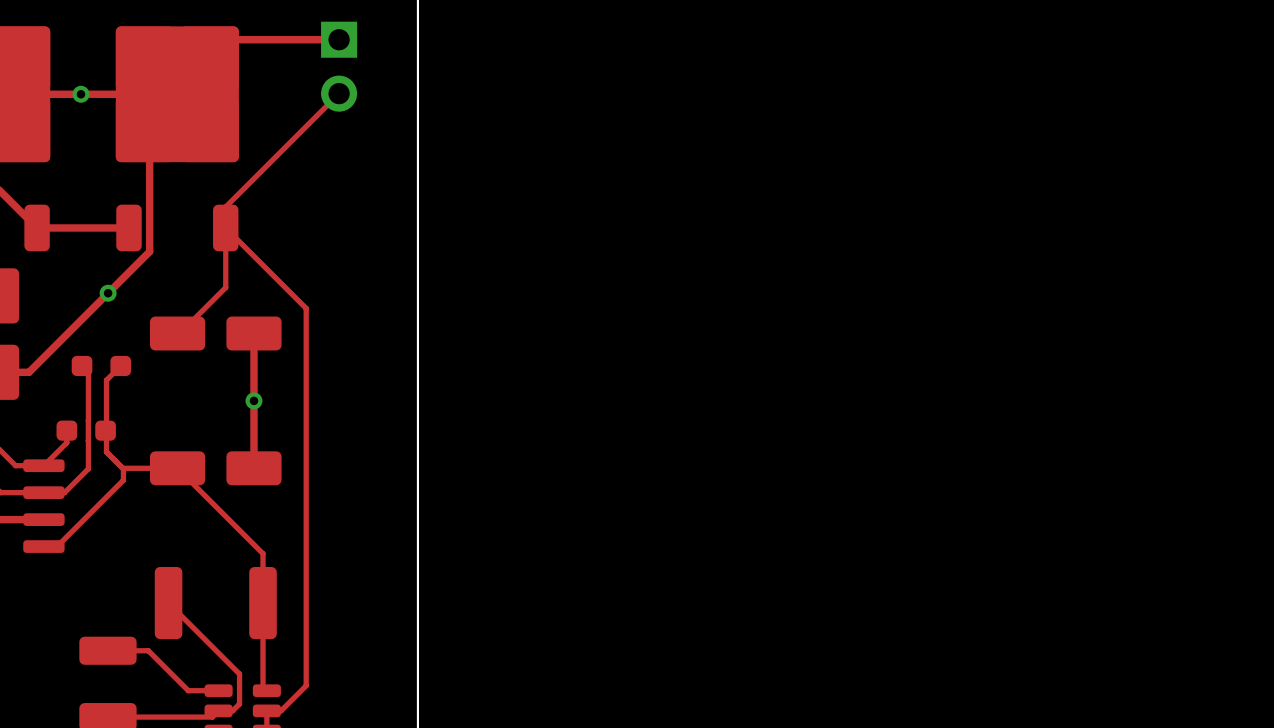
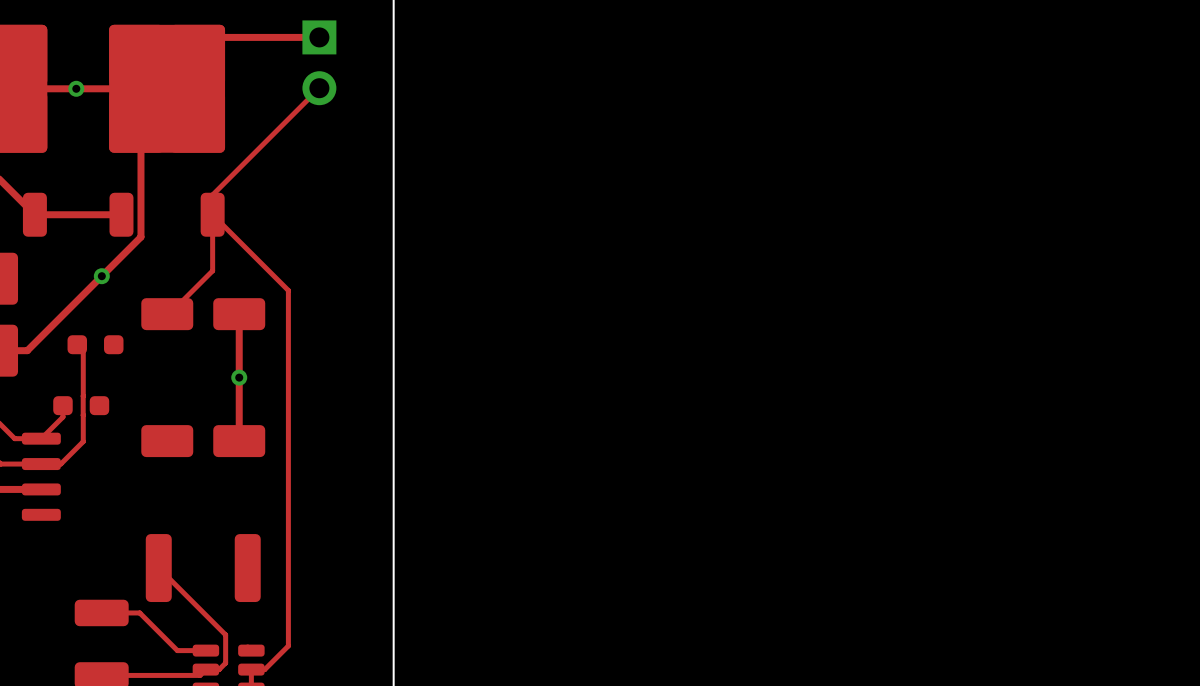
top track: (120, 365) (106, 380) (106, 452) (123, 469) (123, 480) (57, 546) -> none
top track: (122, 468) (177, 468) (263, 553) (263, 686) -> none

